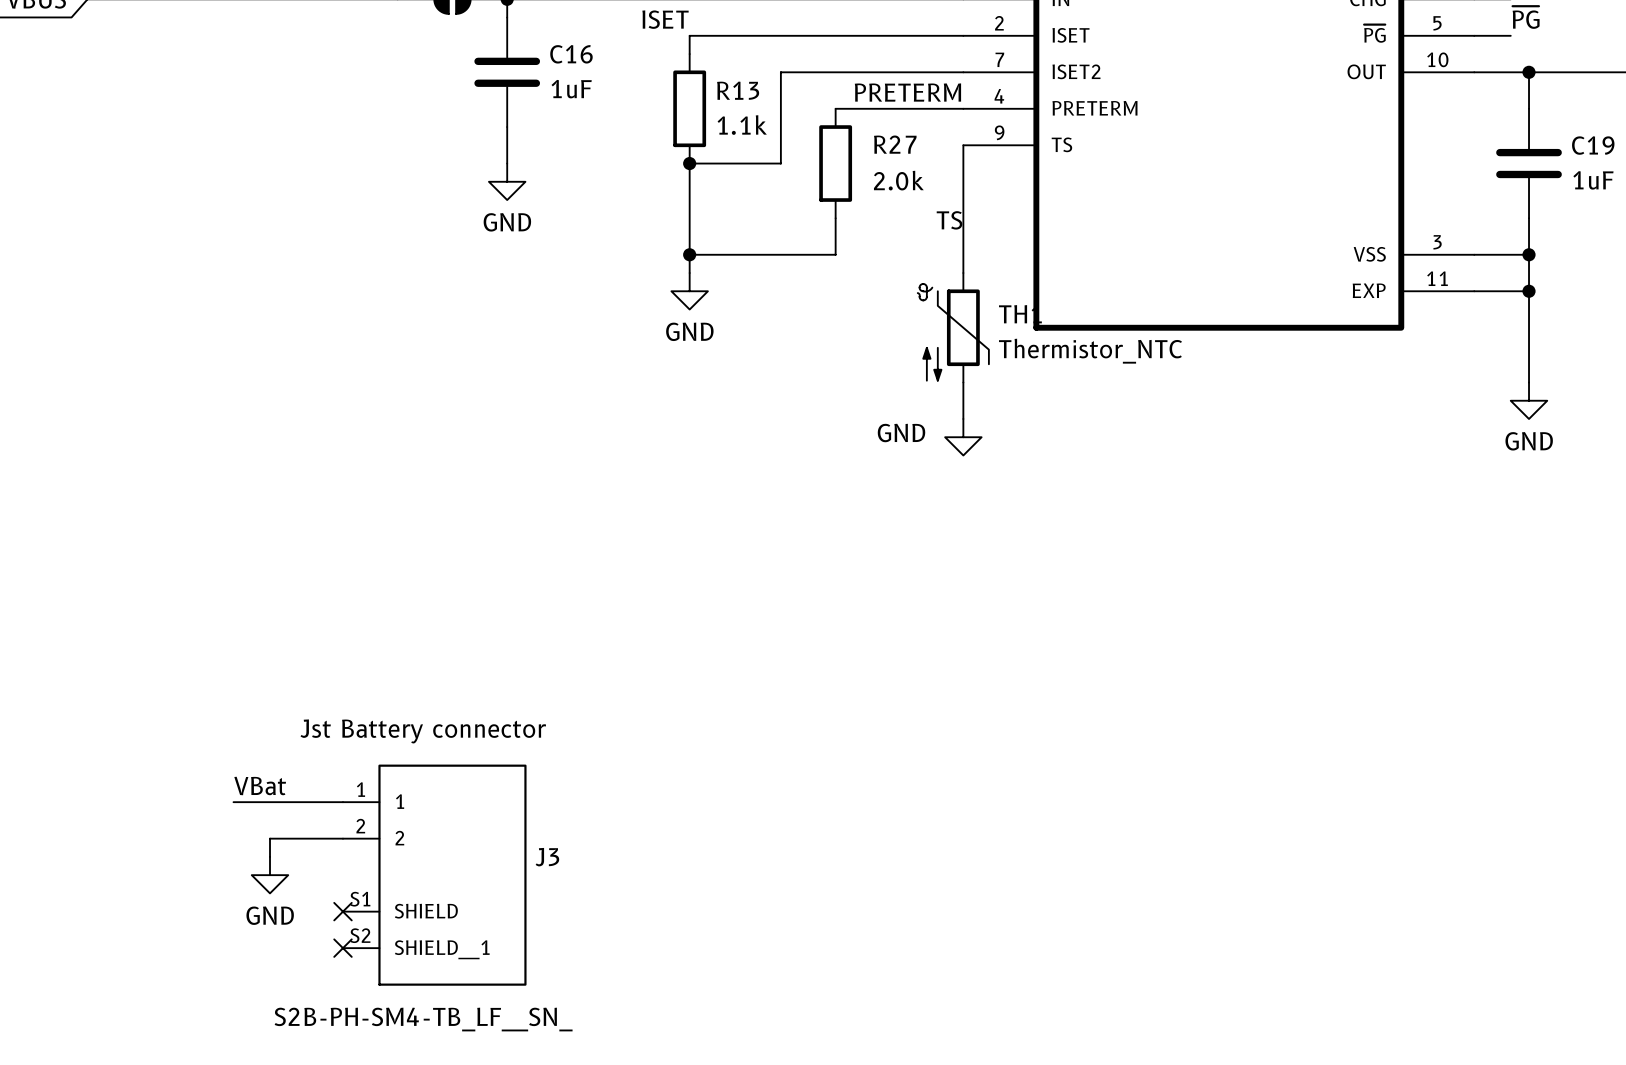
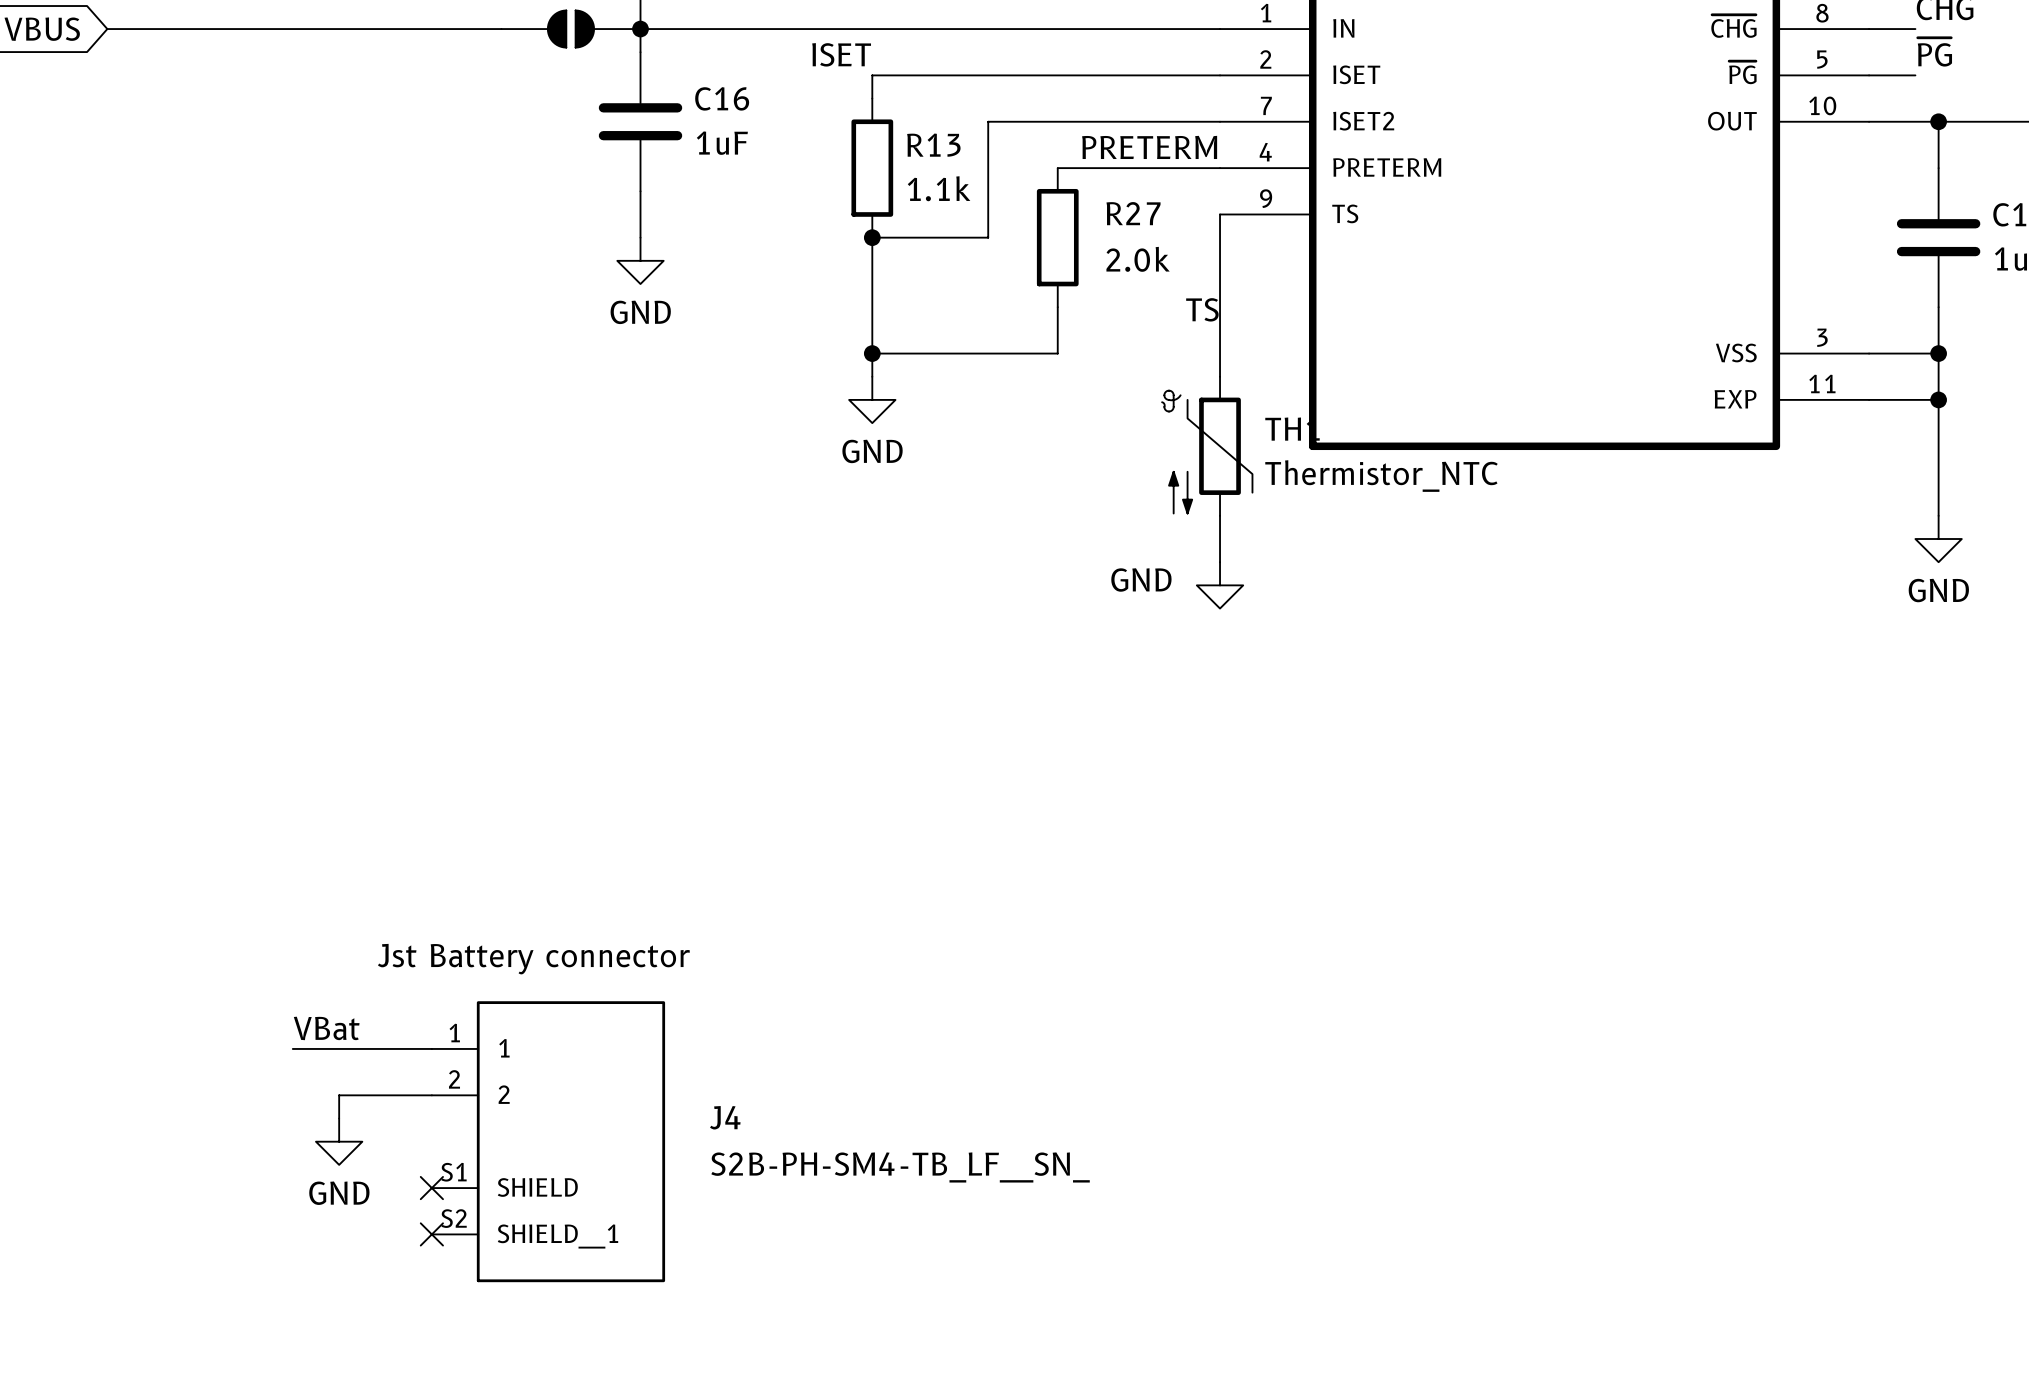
J3 name: J3 (547, 857) -> J4 (725, 1117)
J3 value position: S2B-PH-SM4-TB_LF__SN_ (423, 1019) -> S2B-PH-SM4-TB_LF__SN_ (900, 1167)

